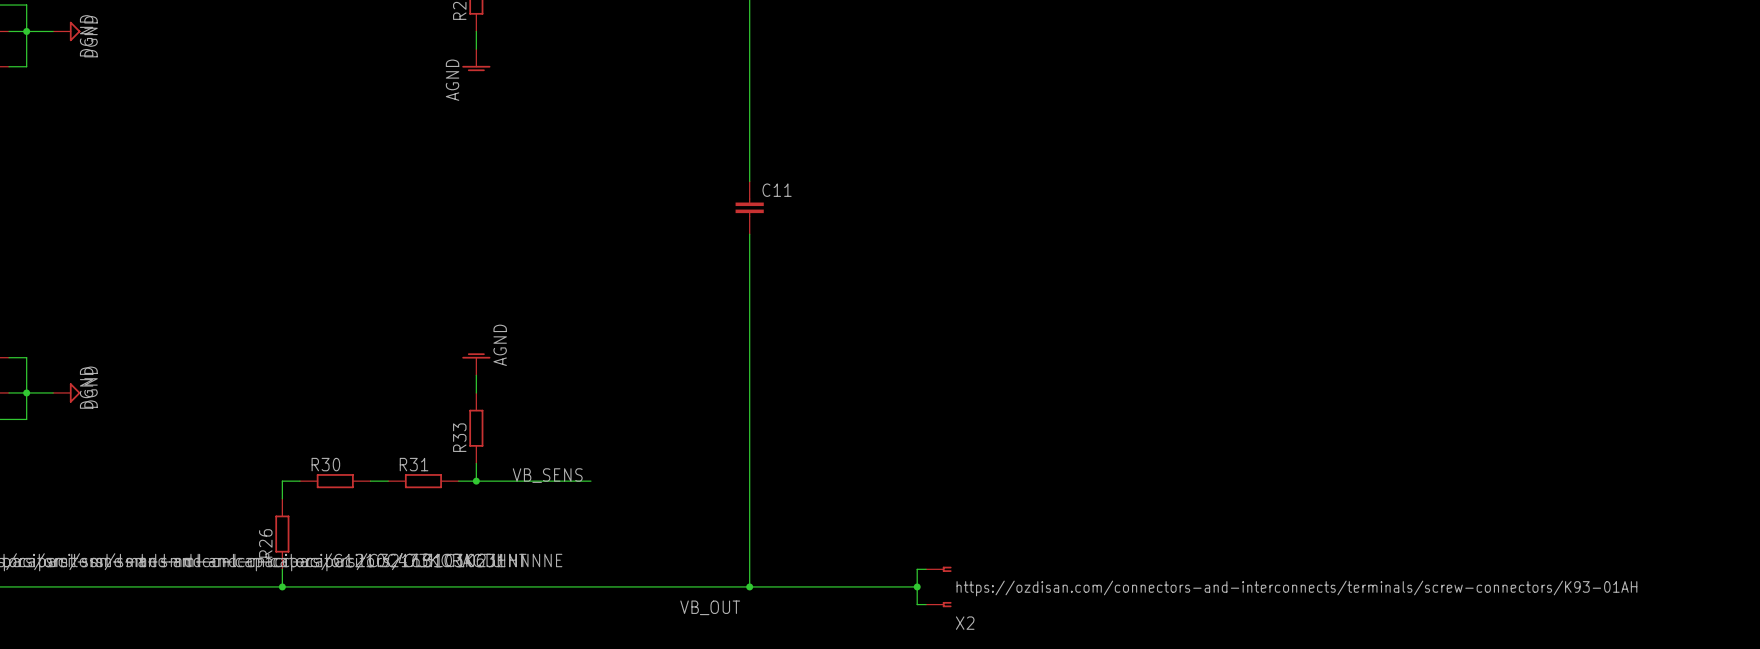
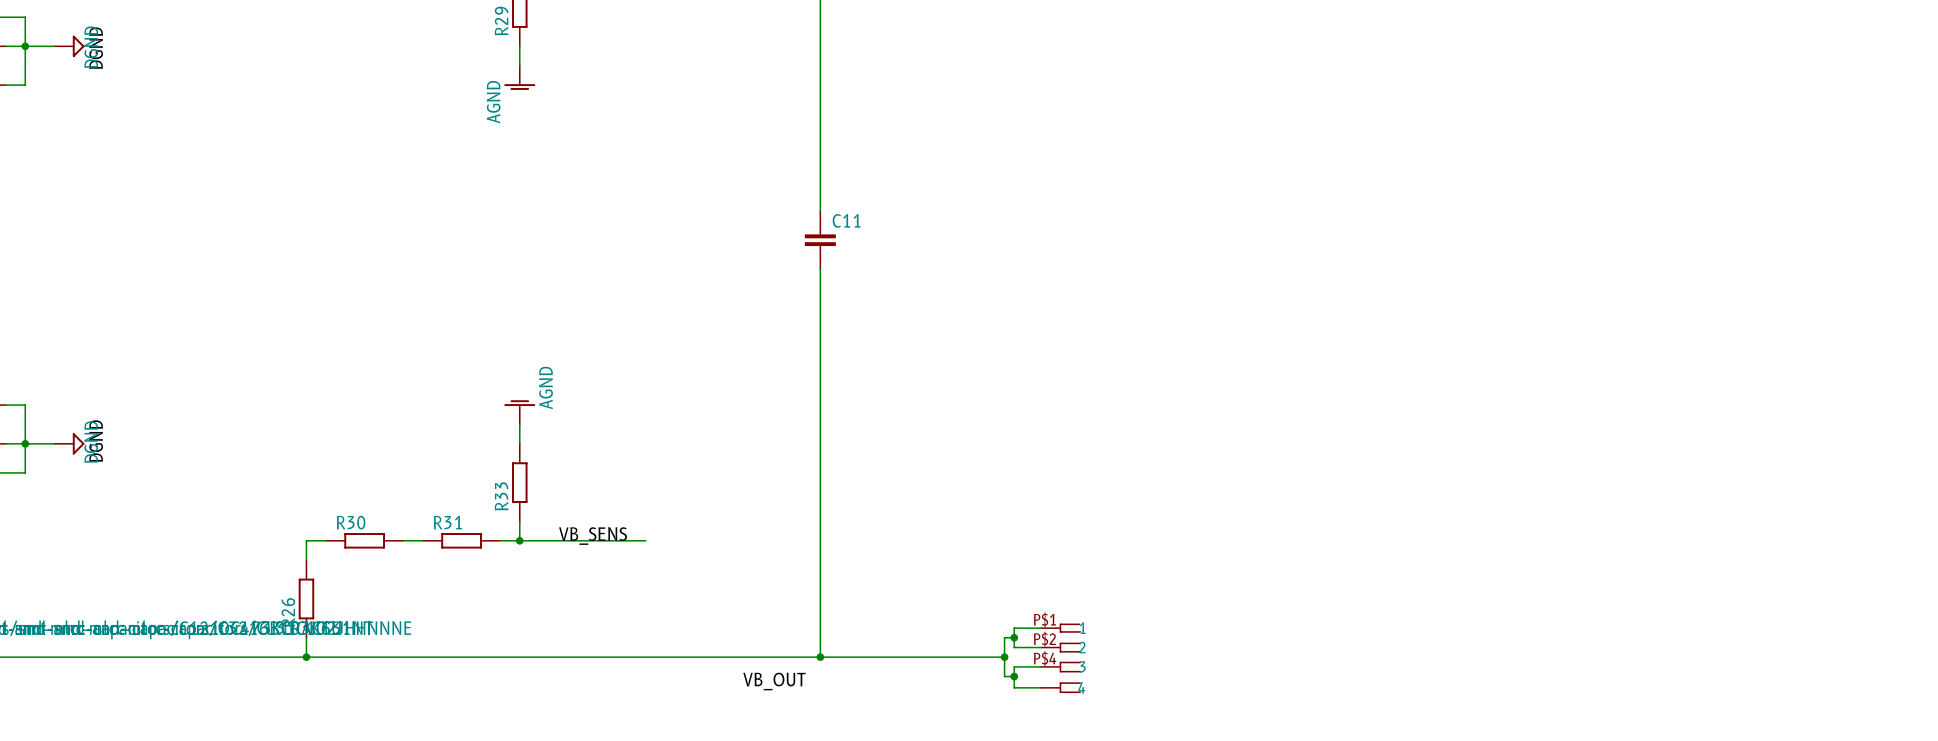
wire: none -> (1041, 628) (1014, 628) (1014, 647) (1041, 647)
junction: none -> (1014, 637)
X2: https://ozdisan.com/connectors-and-interconnects/terminals/screw-connectors/K93-01AH (938, 586) -> none
part: none -> (1060, 658)
wire: none -> (1041, 666) (1014, 666) (1014, 687) (1040, 687)
junction: none -> (1014, 676)

